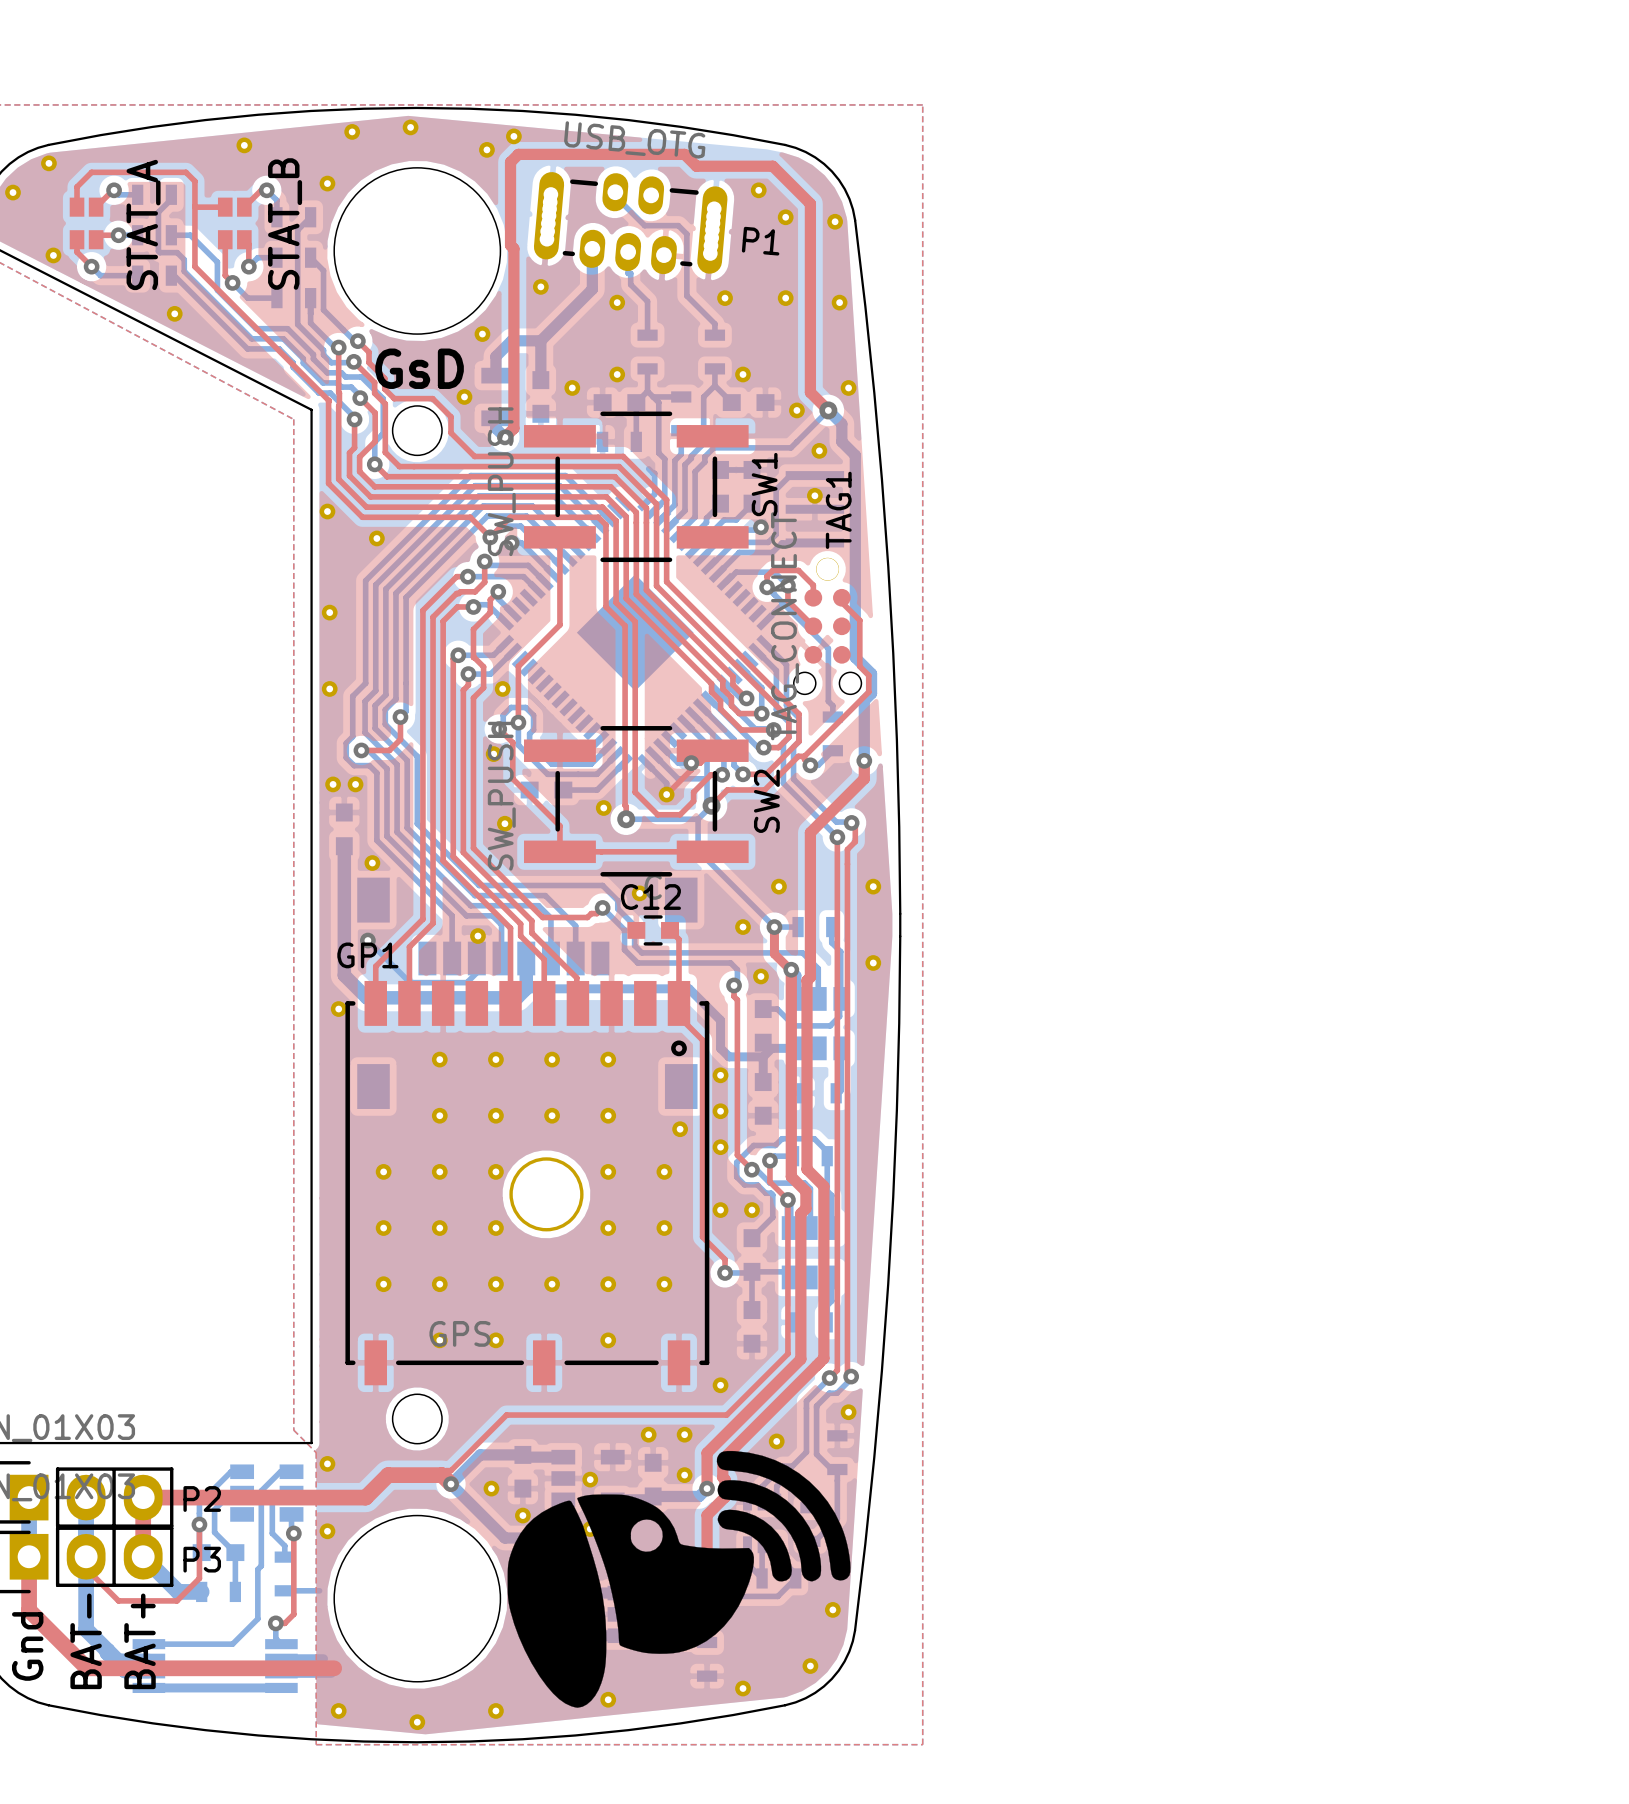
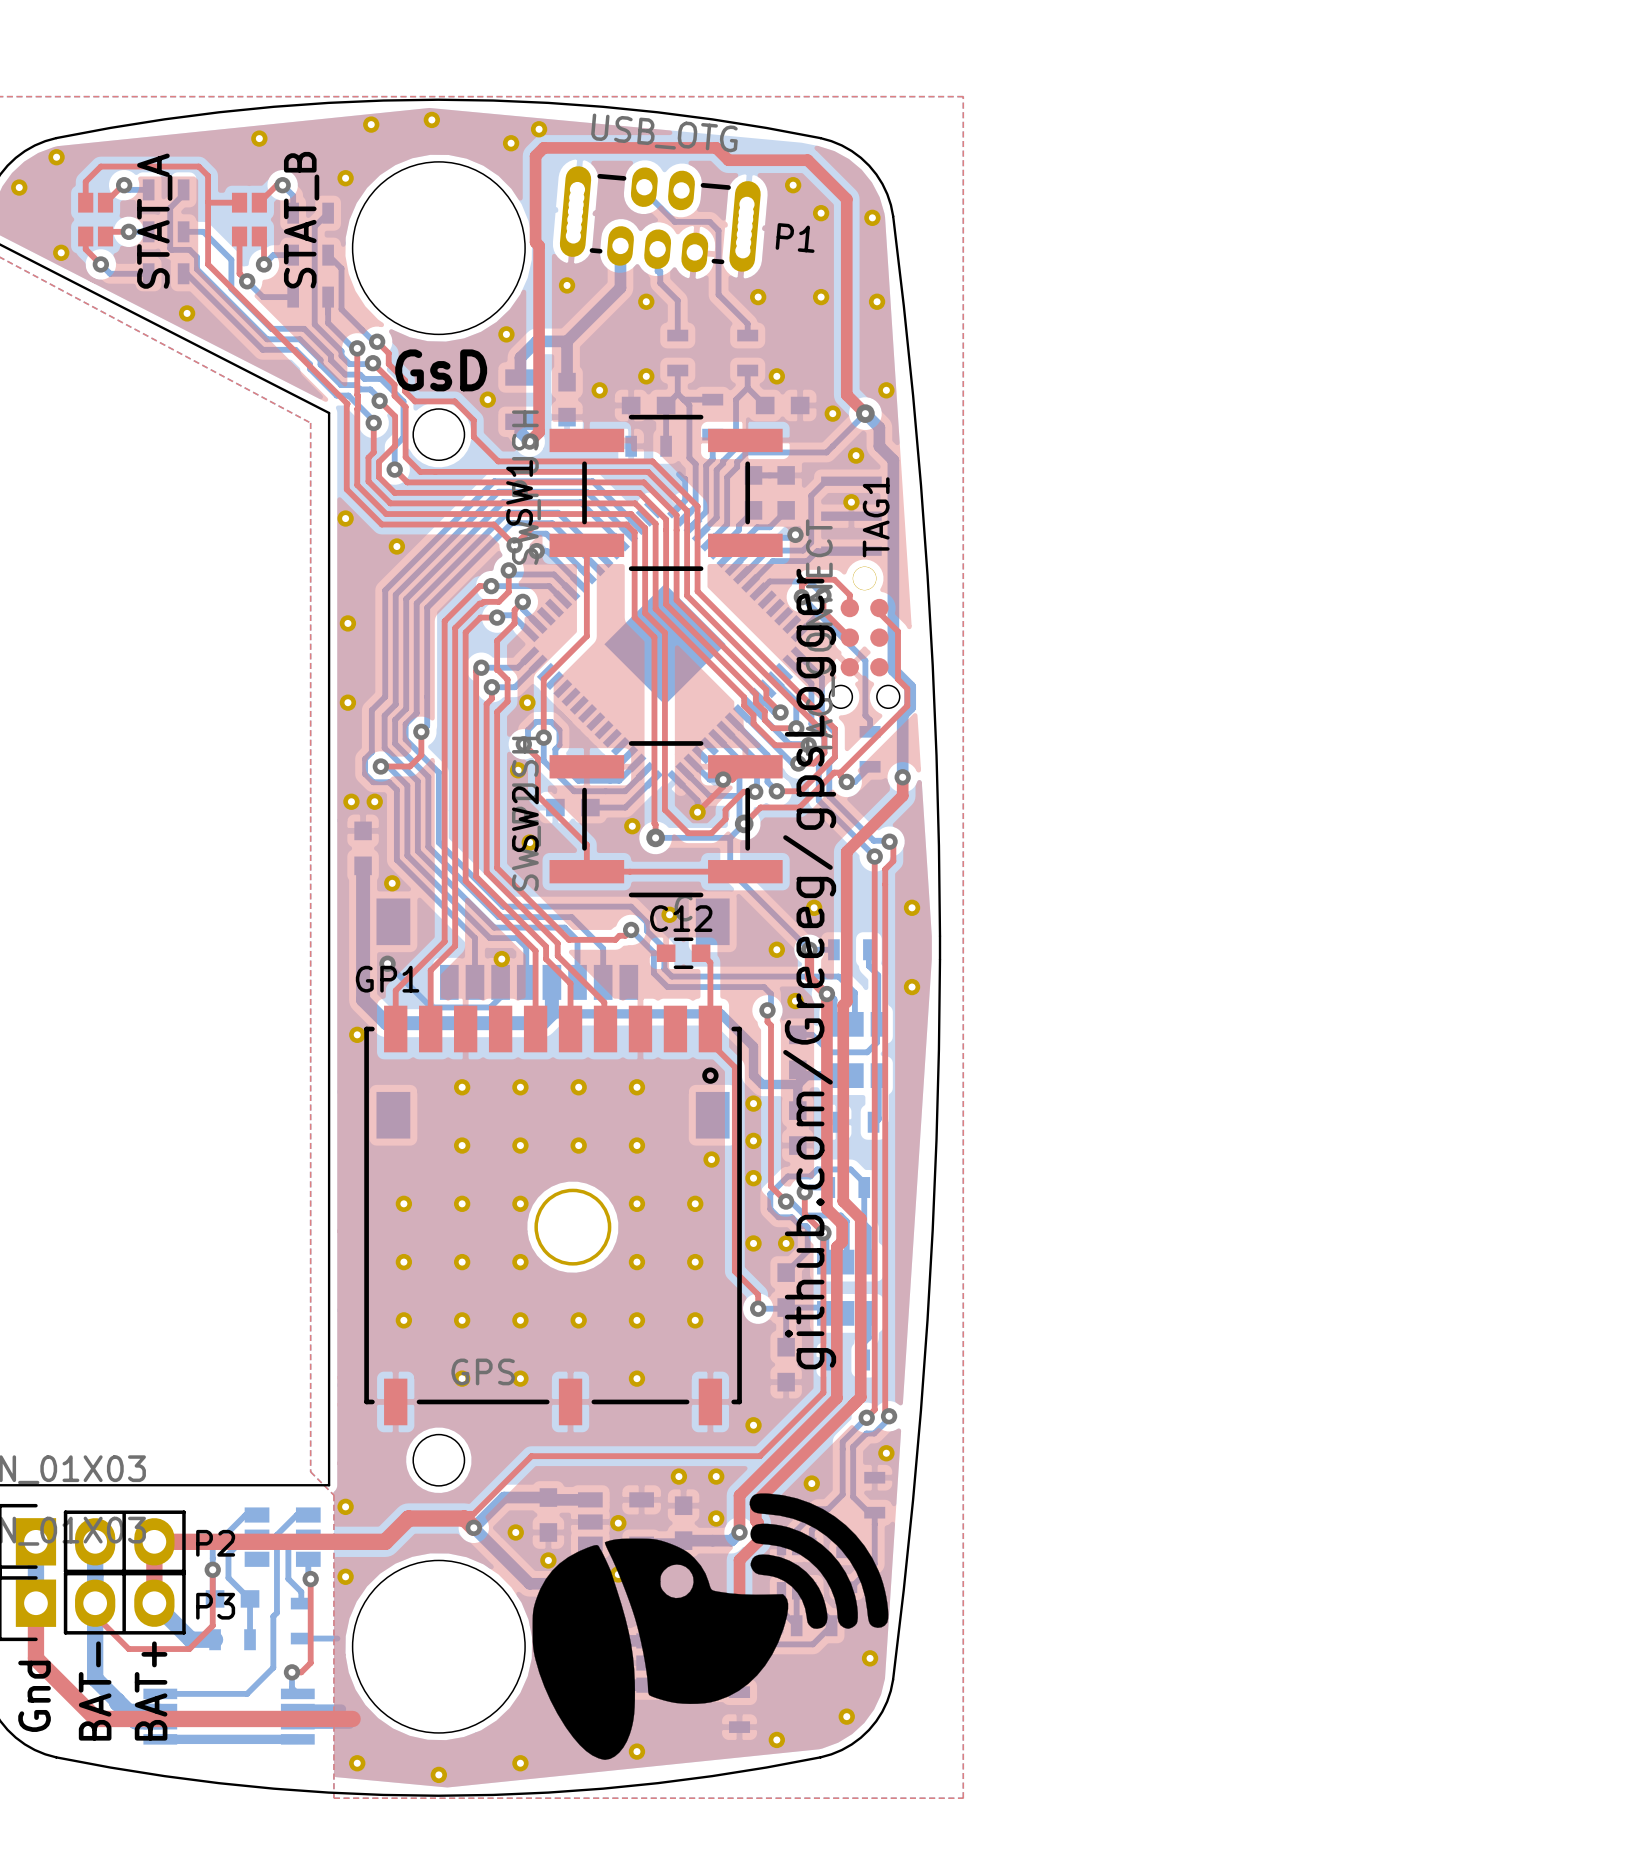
SW1 name position: SW1 (764, 484) -> SW1 (519, 492)
SW2 name position: SW2 (766, 801) -> SW2 (525, 819)
text: none -> github.com/Greeeg/gpsLogger (809, 969)

